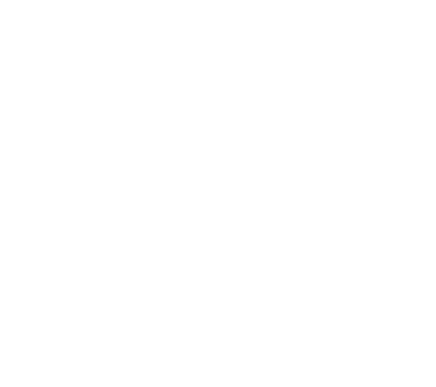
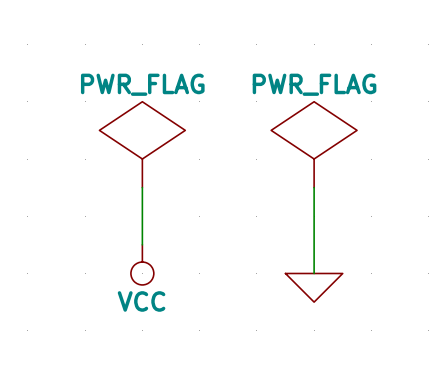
power symbol: none -> PWR_FLAG (142, 144)
power symbol: none -> PWR_FLAG (314, 144)
wire: none -> (142, 187) (142, 244)
wire: none -> (314, 187) (314, 273)
power symbol: none -> VCC (142, 264)
power symbol: none -> (314, 287)

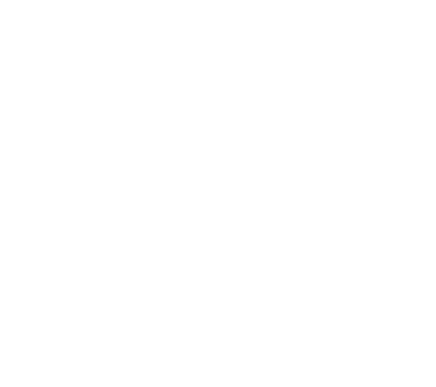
power symbol: PWR_FLAG (142, 144) -> none
power symbol: PWR_FLAG (314, 144) -> none
wire: (142, 187) (142, 244) -> none
wire: (314, 187) (314, 273) -> none
power symbol: VCC (142, 264) -> none
power symbol: (314, 287) -> none

